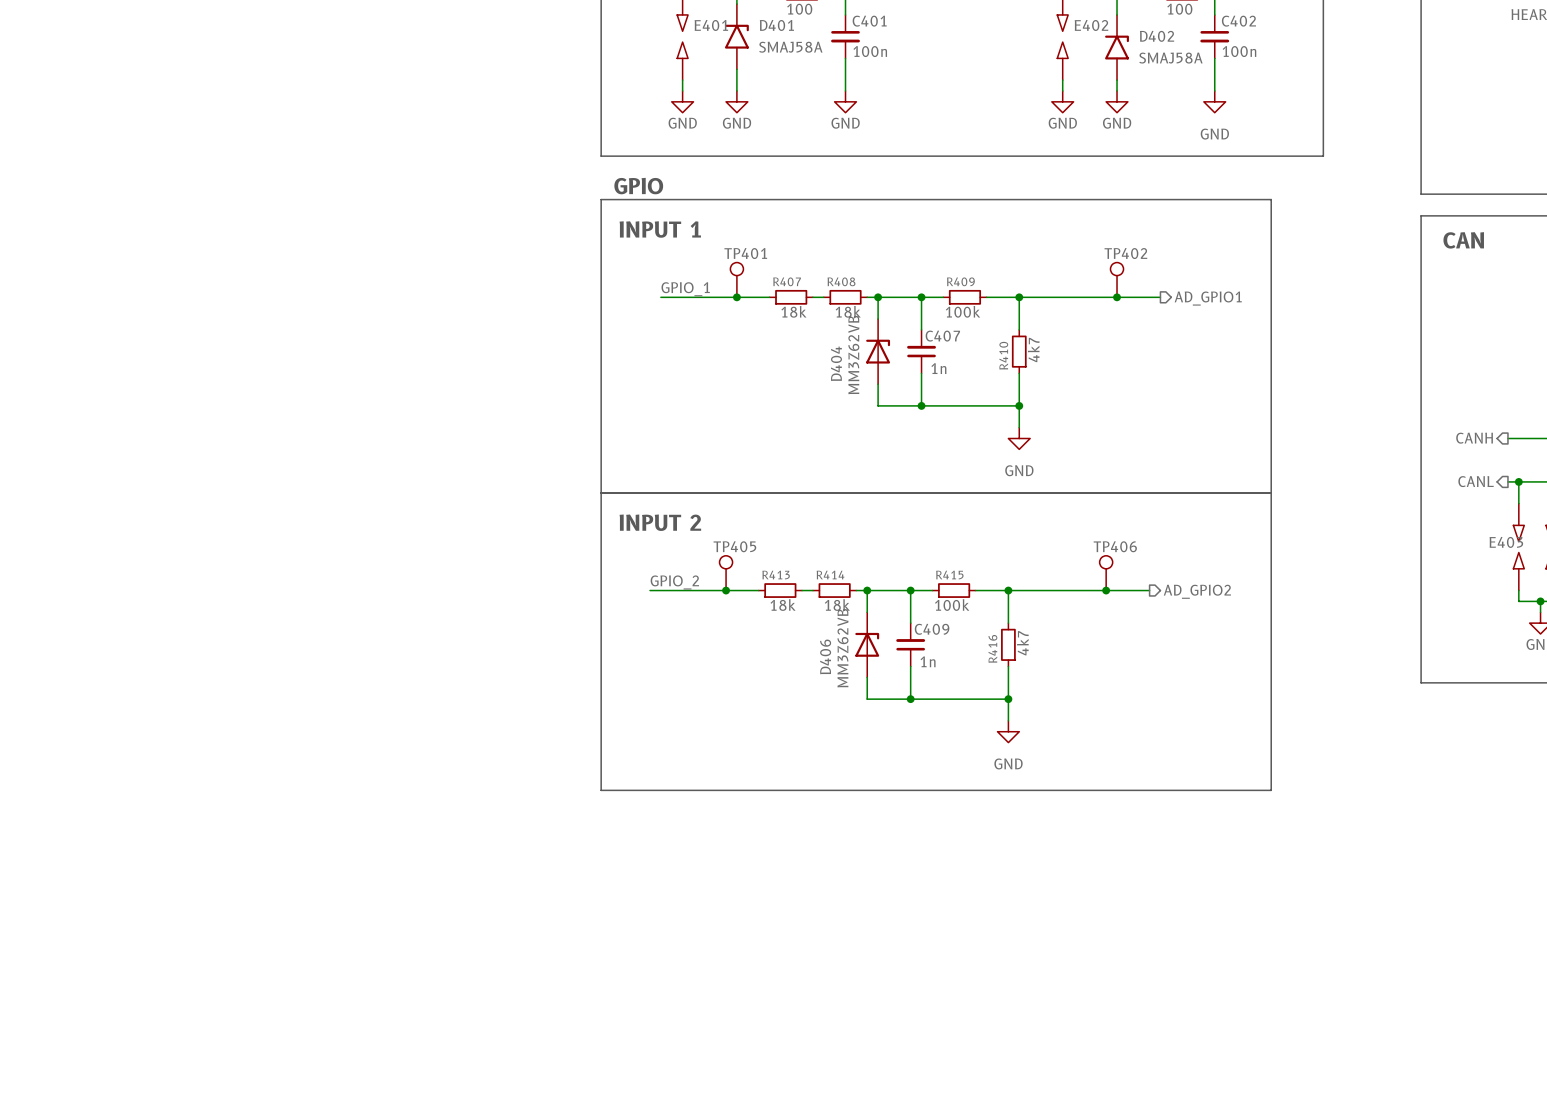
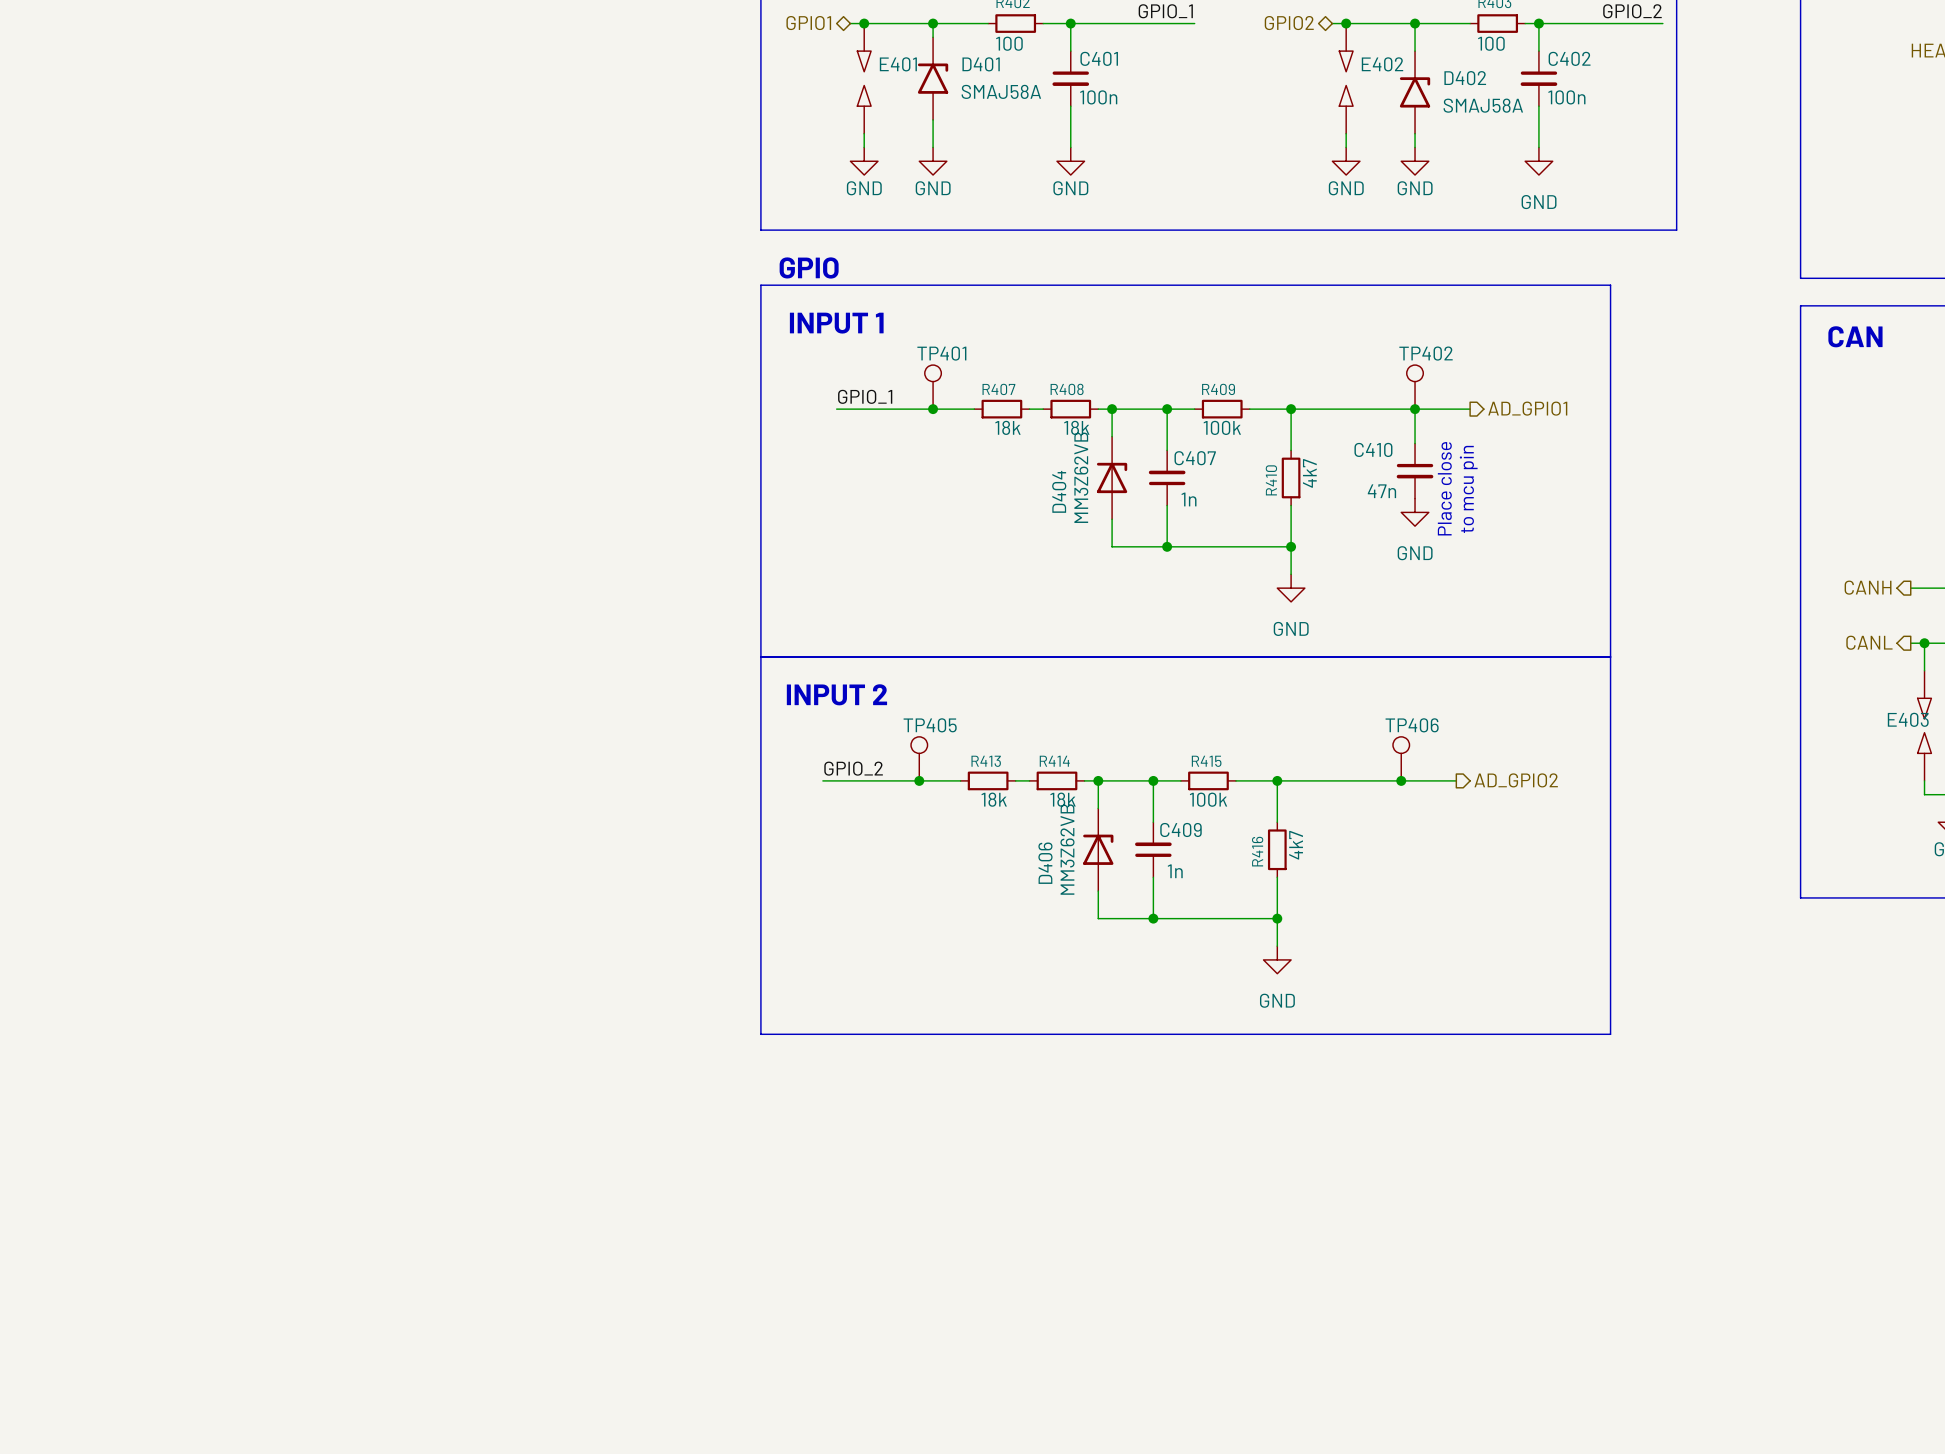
wire: none -> (1415, 409) (1415, 443)
C410: none -> 47n (1415, 471)
text: none -> Place close (1444, 488)
text: none -> to mcu pin (1468, 489)
power symbol: none -> GND (1415, 512)

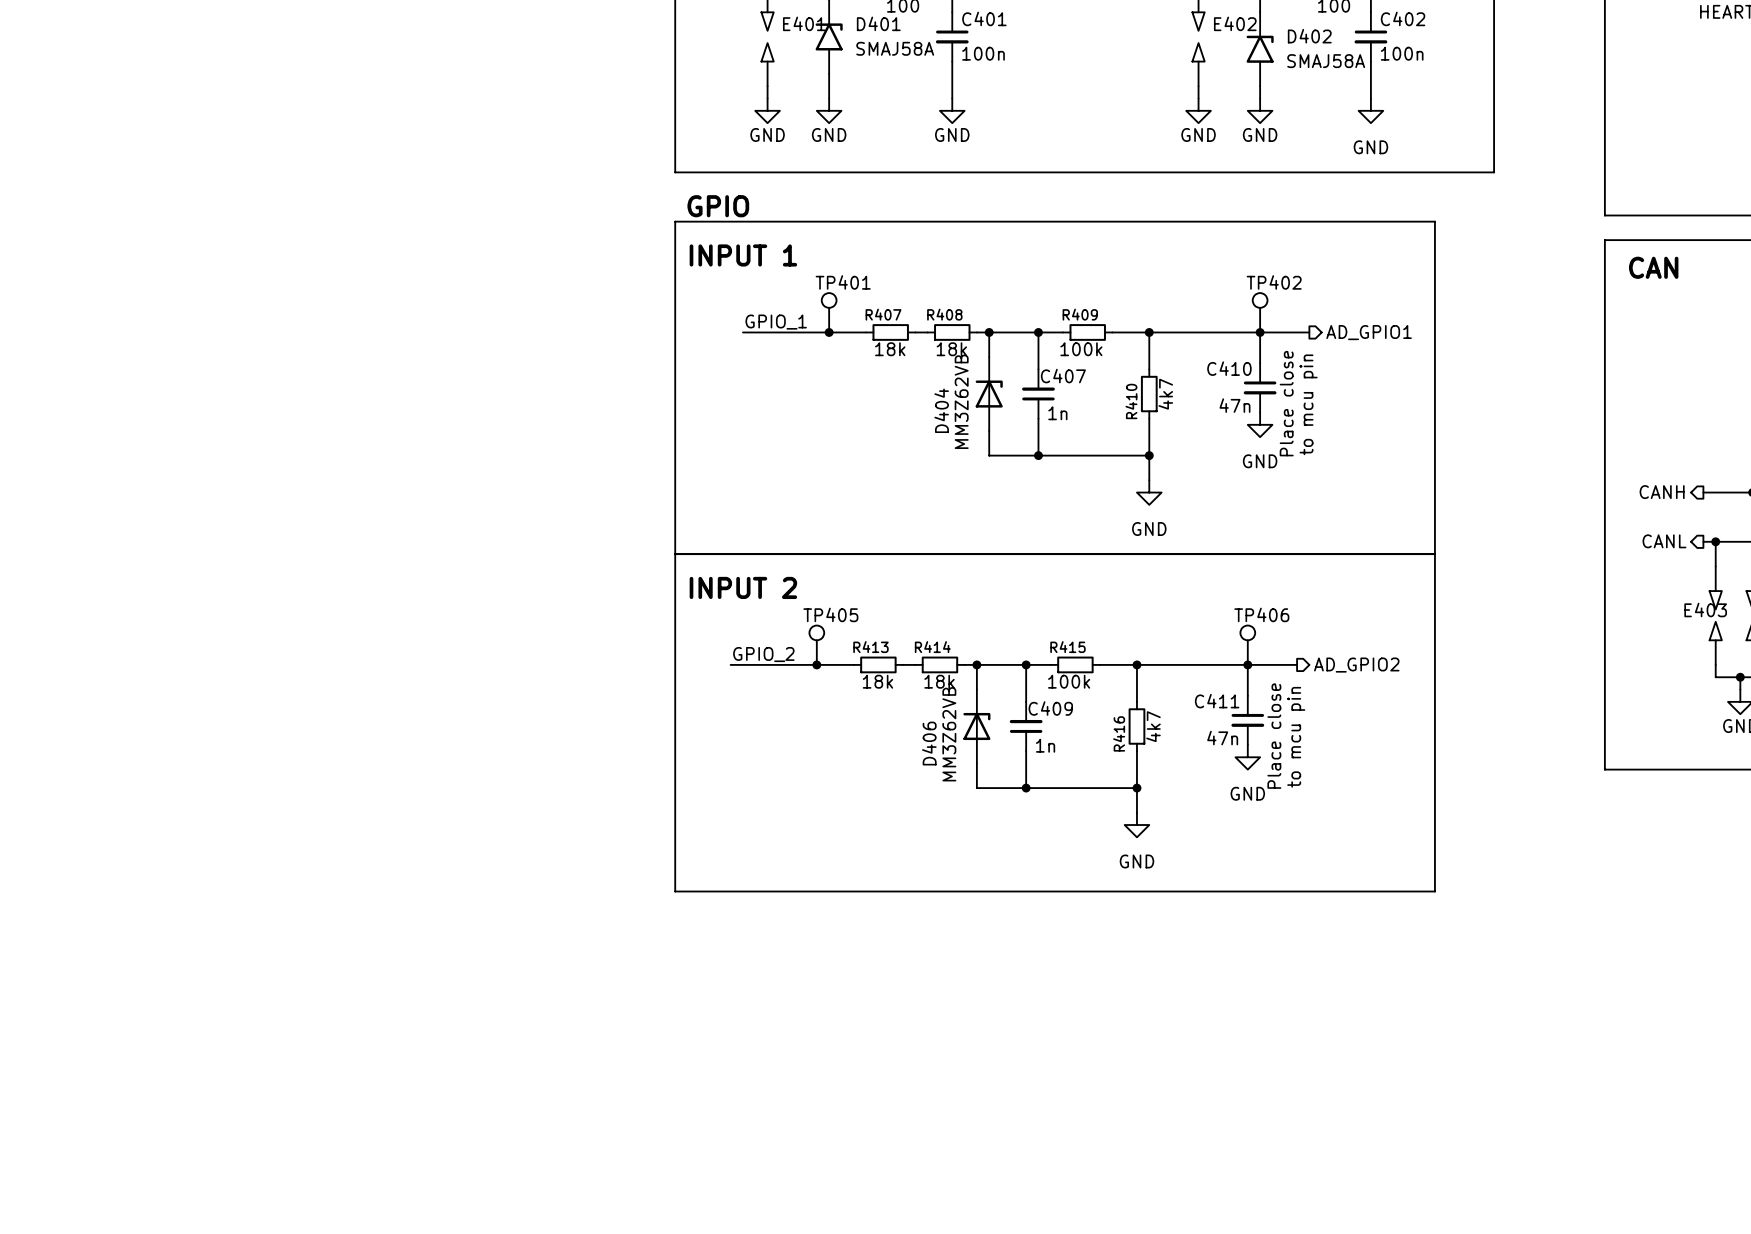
wire: none -> (1247, 664) (1247, 695)
C411: none -> 47n (1247, 720)
text: none -> Place close (1274, 736)
text: none -> to mcu pin (1296, 737)
power symbol: none -> GND (1247, 757)

